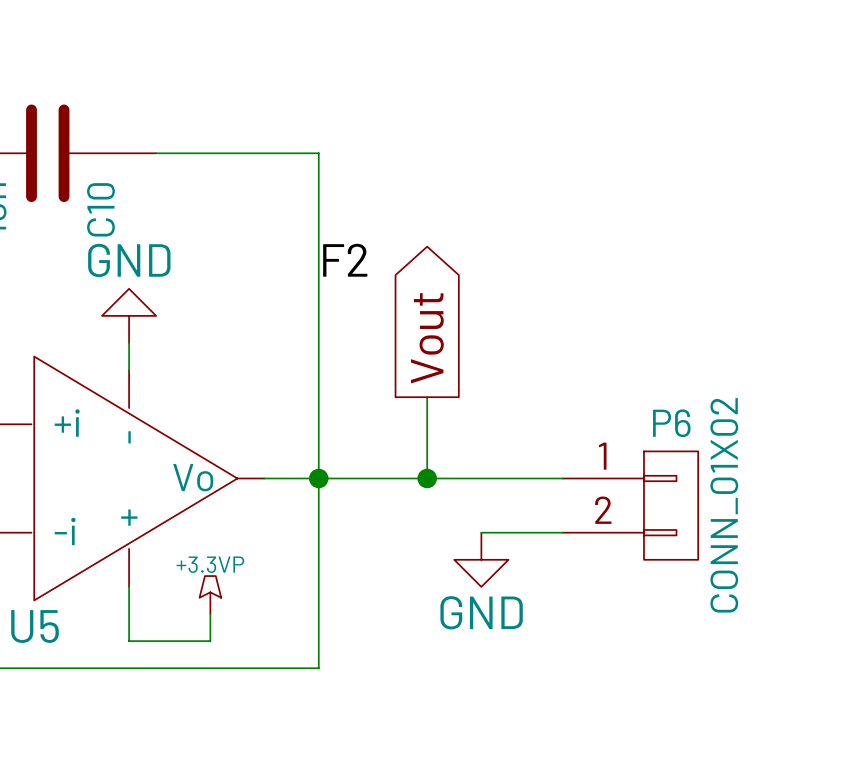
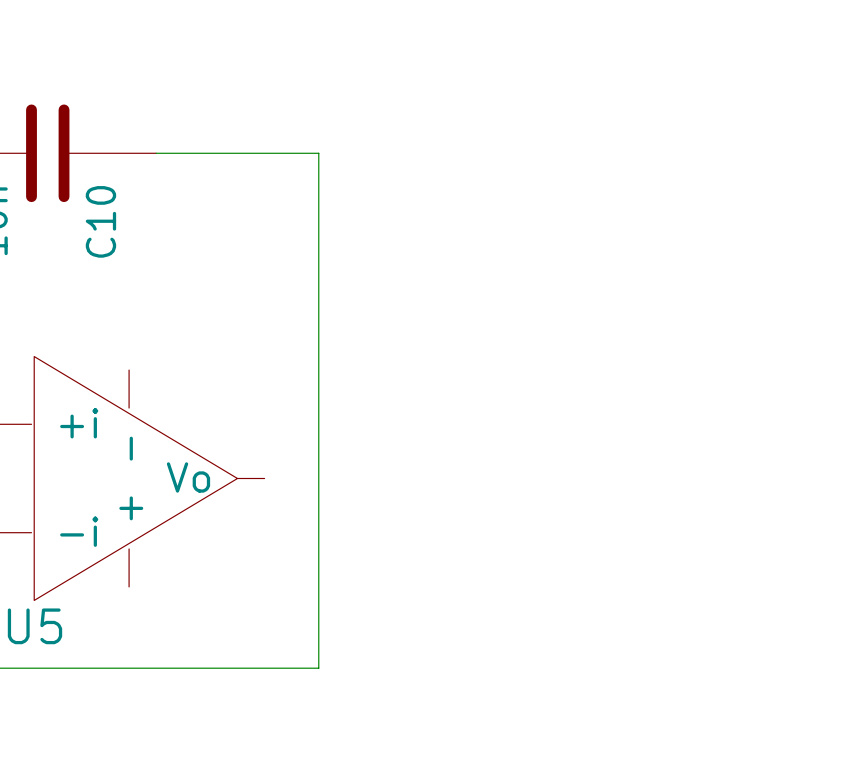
label: F2 (345, 260) -> none
power symbol: GND (129, 315) -> none
global label: Vout (427, 338) -> none
wire: (129, 342) (129, 370) -> none
wire: (427, 397) (427, 478) -> none
wire: (264, 478) (562, 478) -> none
junction: (318, 478) -> none
junction: (427, 478) -> none
P6: CONN_01X02 (630, 505) -> none
wire: (481, 532) (562, 532) -> none
power symbol: GND (481, 559) -> none
wire: (129, 586) (129, 641) (210, 641) (210, 614) -> none
power symbol: +3.3VP (210, 595) -> none

